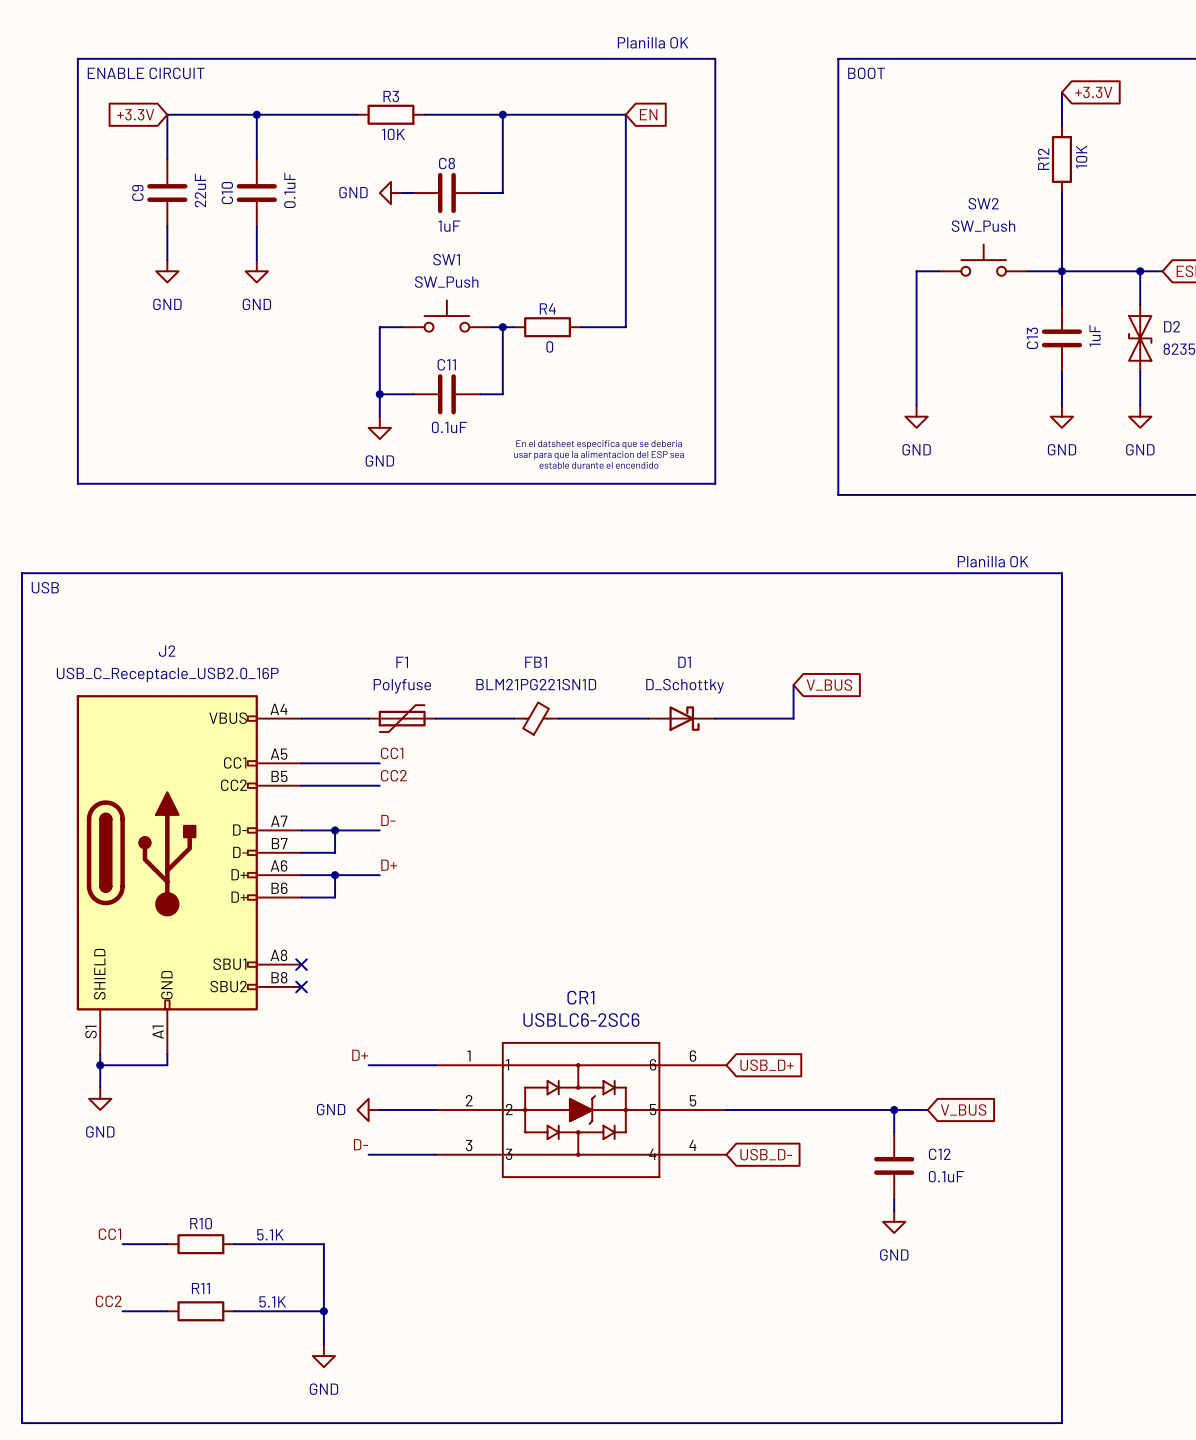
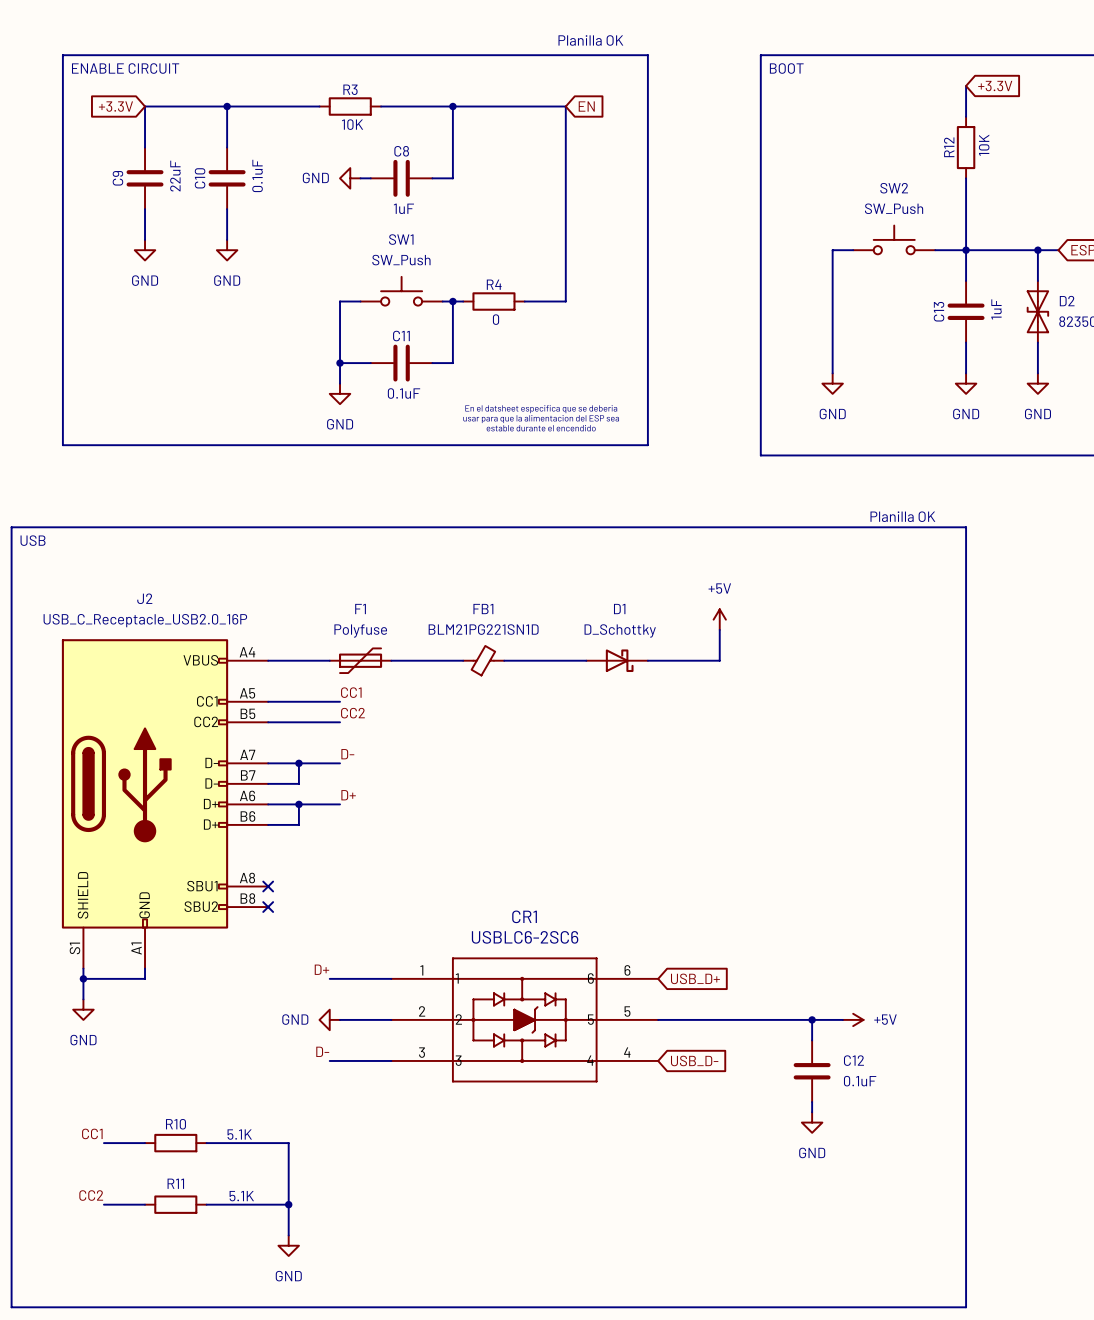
power symbol: none -> +5V (719, 619)
global label: V_BUS (829, 685) -> none
power symbol: none -> +5V (853, 1019)
global label: V_BUS (963, 1109) -> none

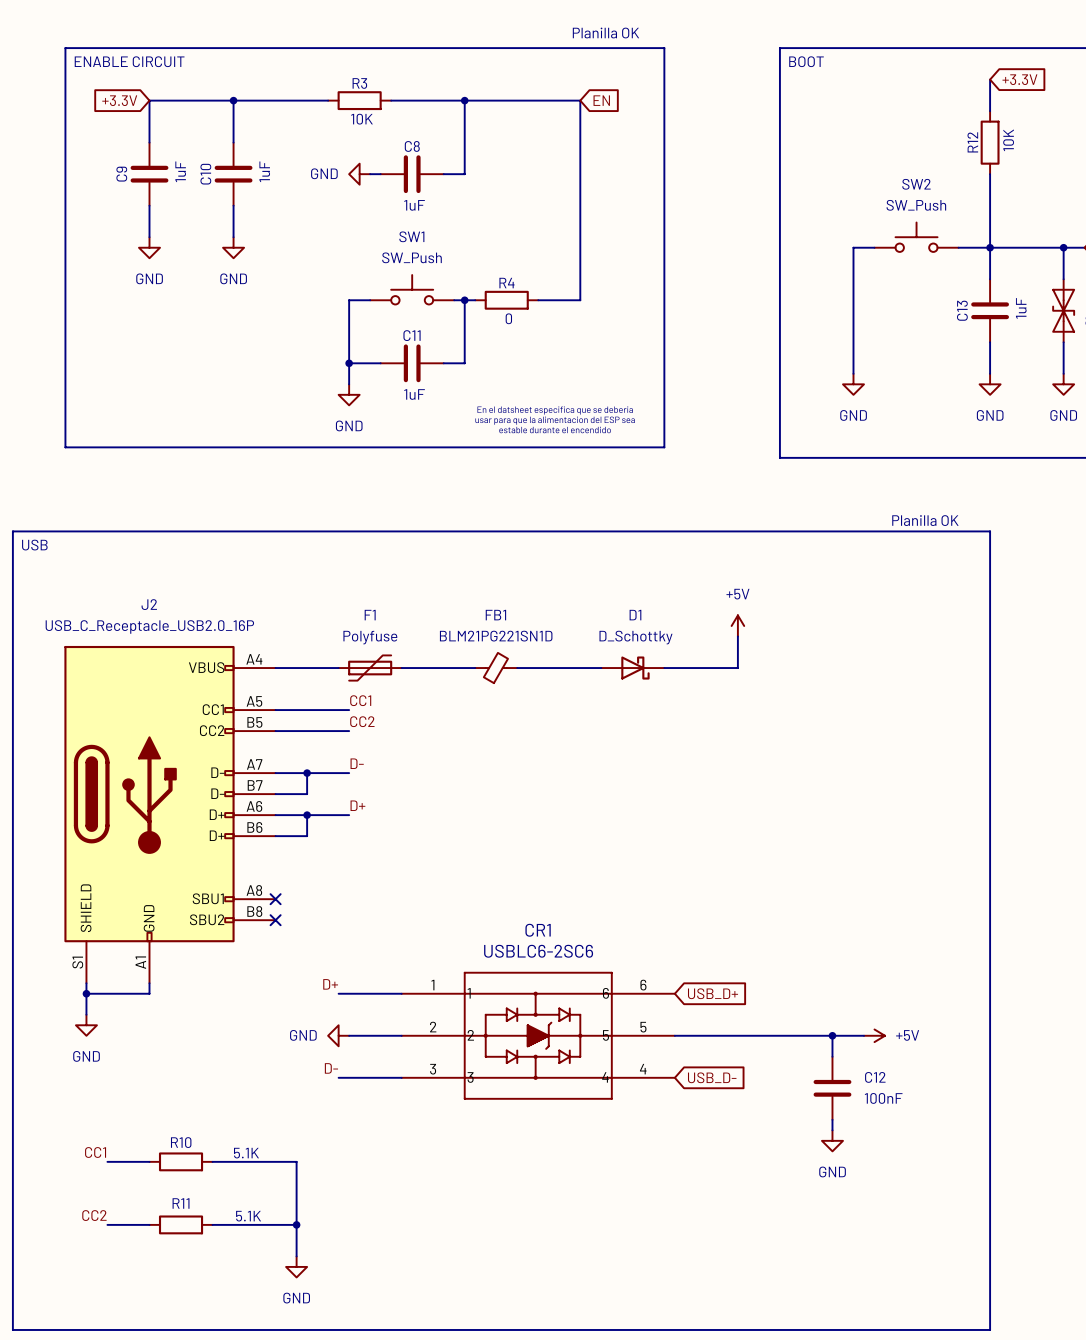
C10 value: 0.1uF (257, 175) -> 1uF (264, 171)
C9 value: 22uF (175, 176) -> 1uF (180, 171)
C11 value: 0.1uF (404, 393) -> 1uF (414, 394)
C12 value: 0.1uF (860, 1081) -> 100nF (883, 1098)

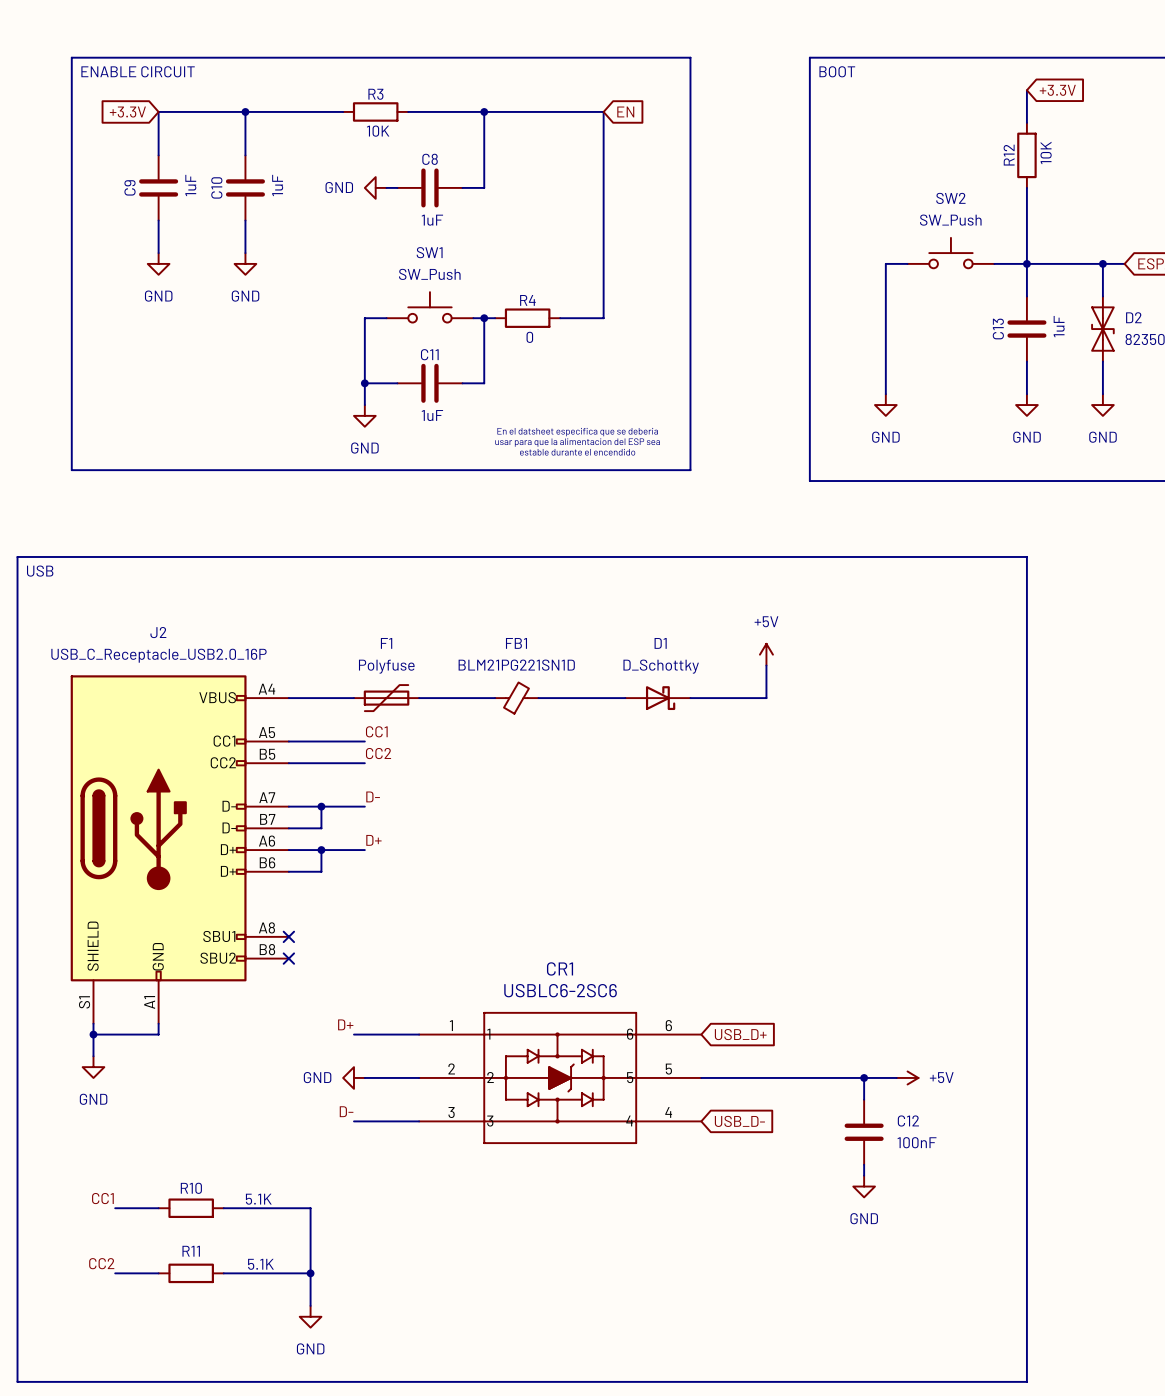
text: Planilla OK (605, 33) -> none
text: Planilla OK (925, 520) -> none

